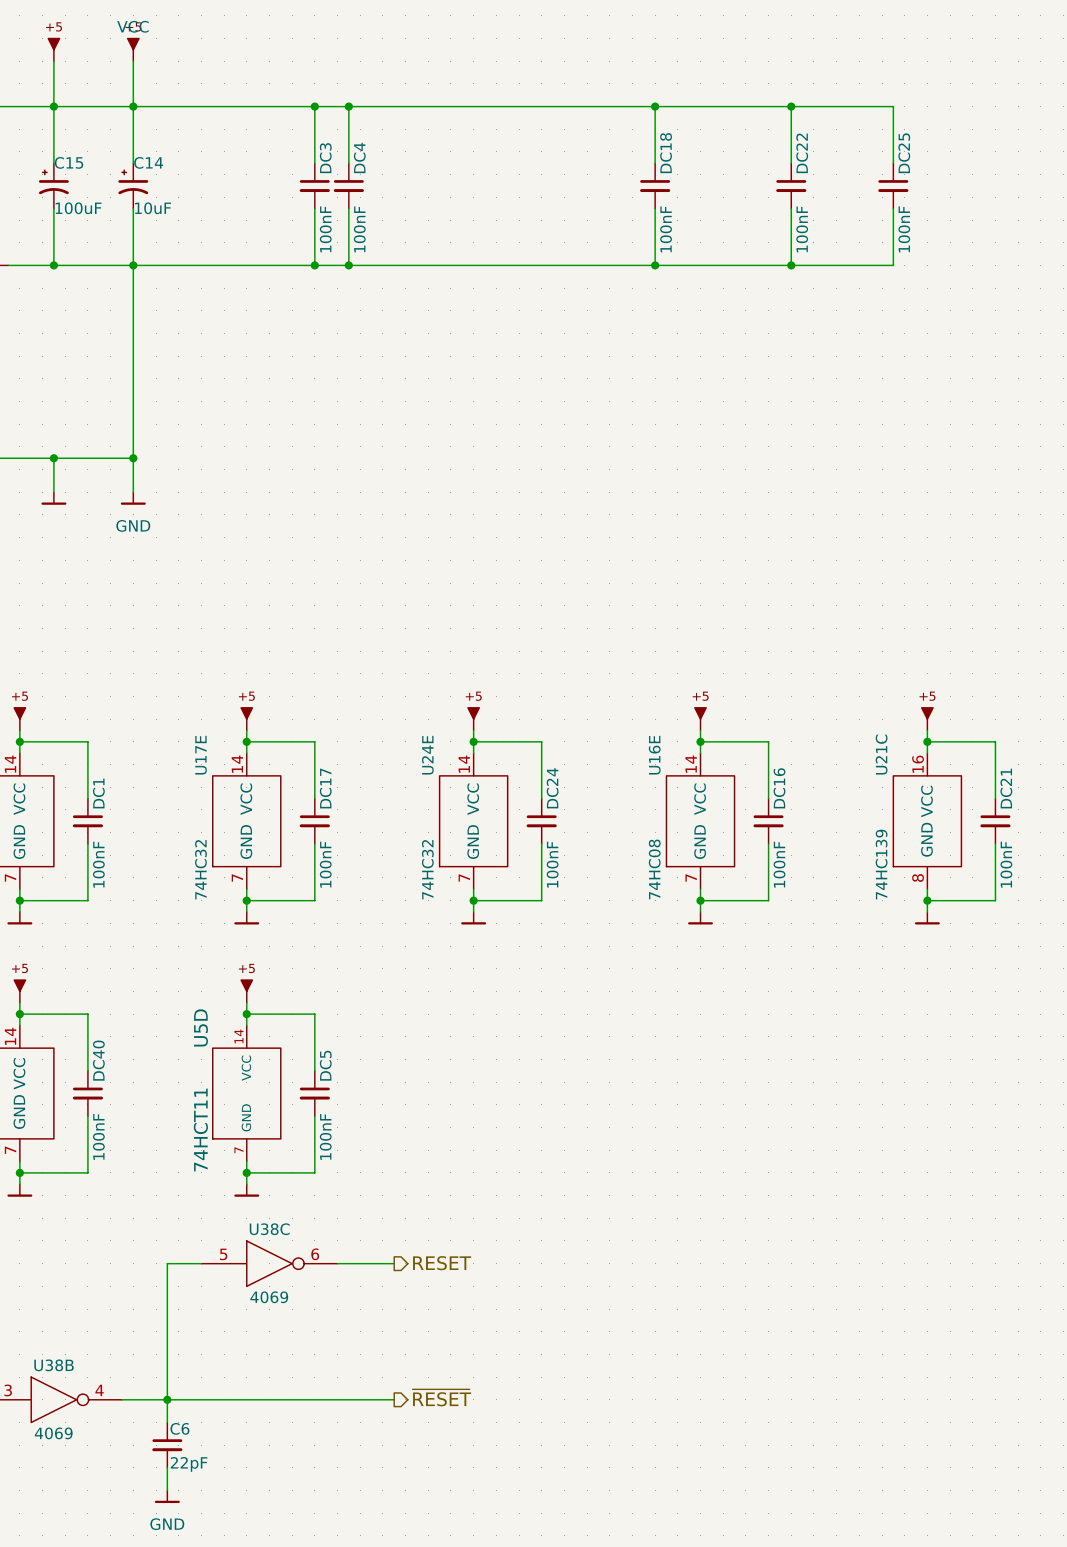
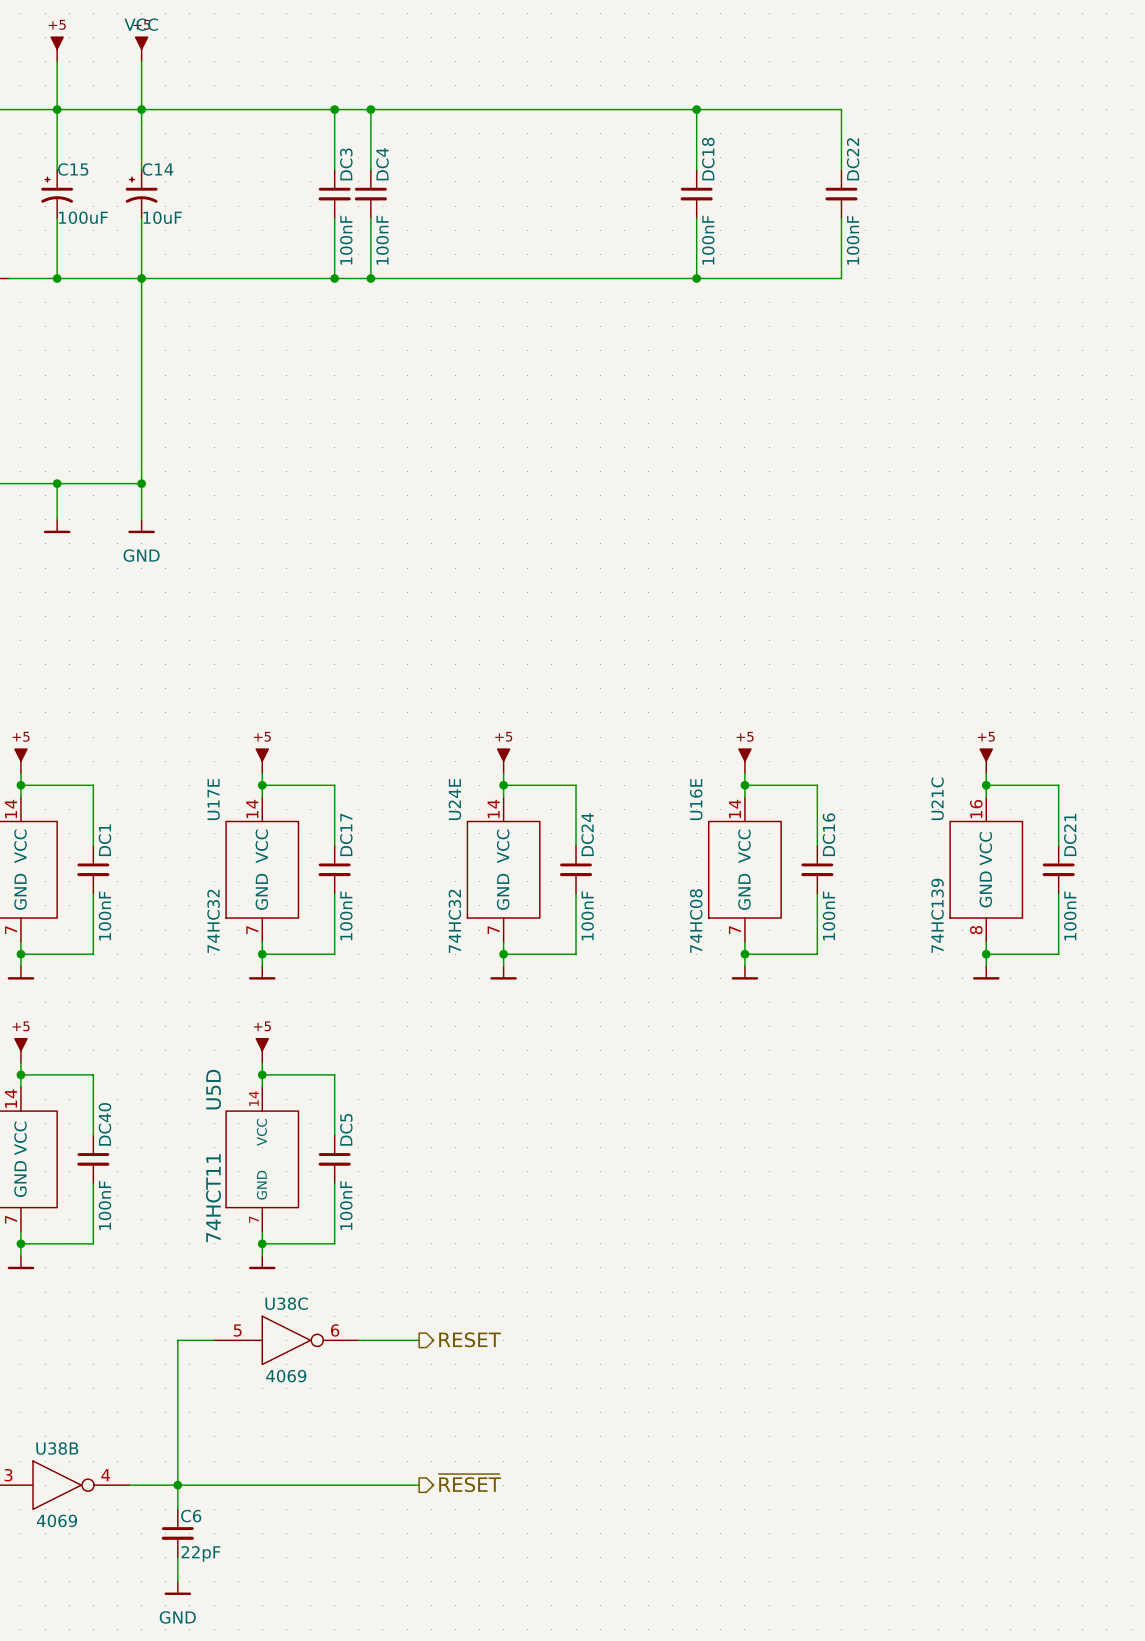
wire: (791, 106) (893, 106) (893, 163) -> none
junction: (791, 106) -> none
DC25: 100nF (893, 186) -> none
wire: (893, 208) (893, 265) (791, 265) -> none
junction: (791, 265) -> none

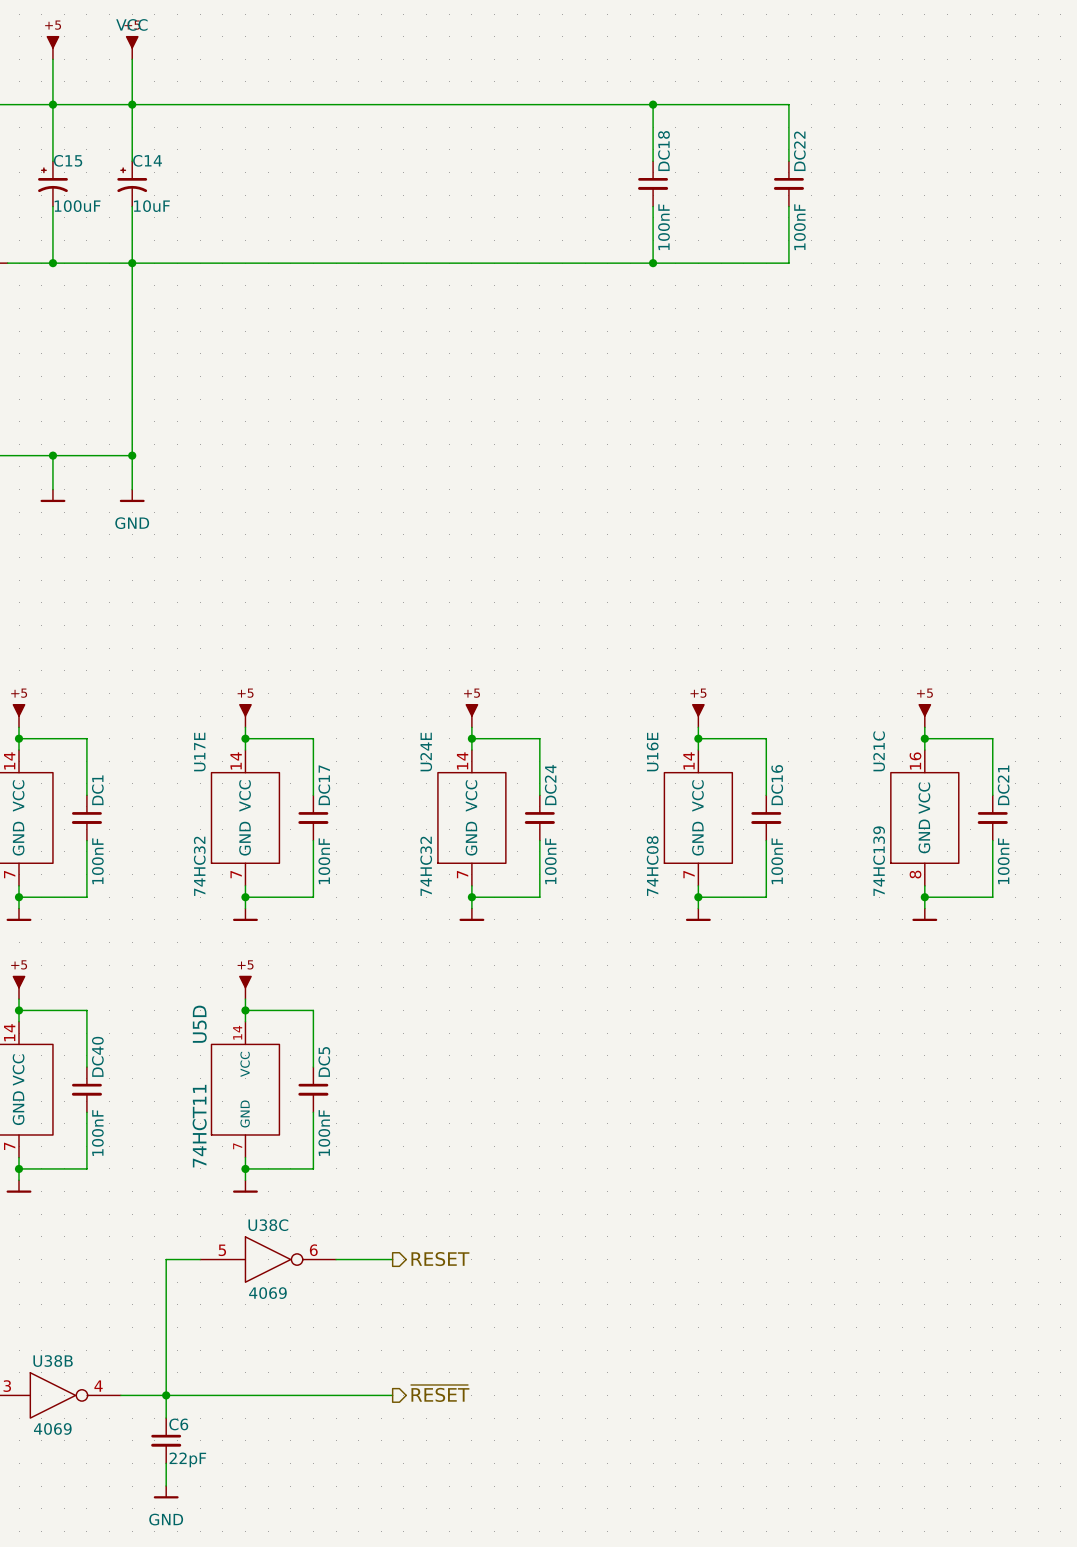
wire: (334, 109) (334, 169) -> none
junction: (334, 109) -> none
wire: (370, 109) (370, 169) -> none
junction: (370, 109) -> none
DC3: 100nF (334, 194) -> none
DC4: 100nF (370, 194) -> none
wire: (334, 218) (334, 278) -> none
wire: (370, 218) (370, 278) -> none
junction: (334, 278) -> none
junction: (370, 278) -> none

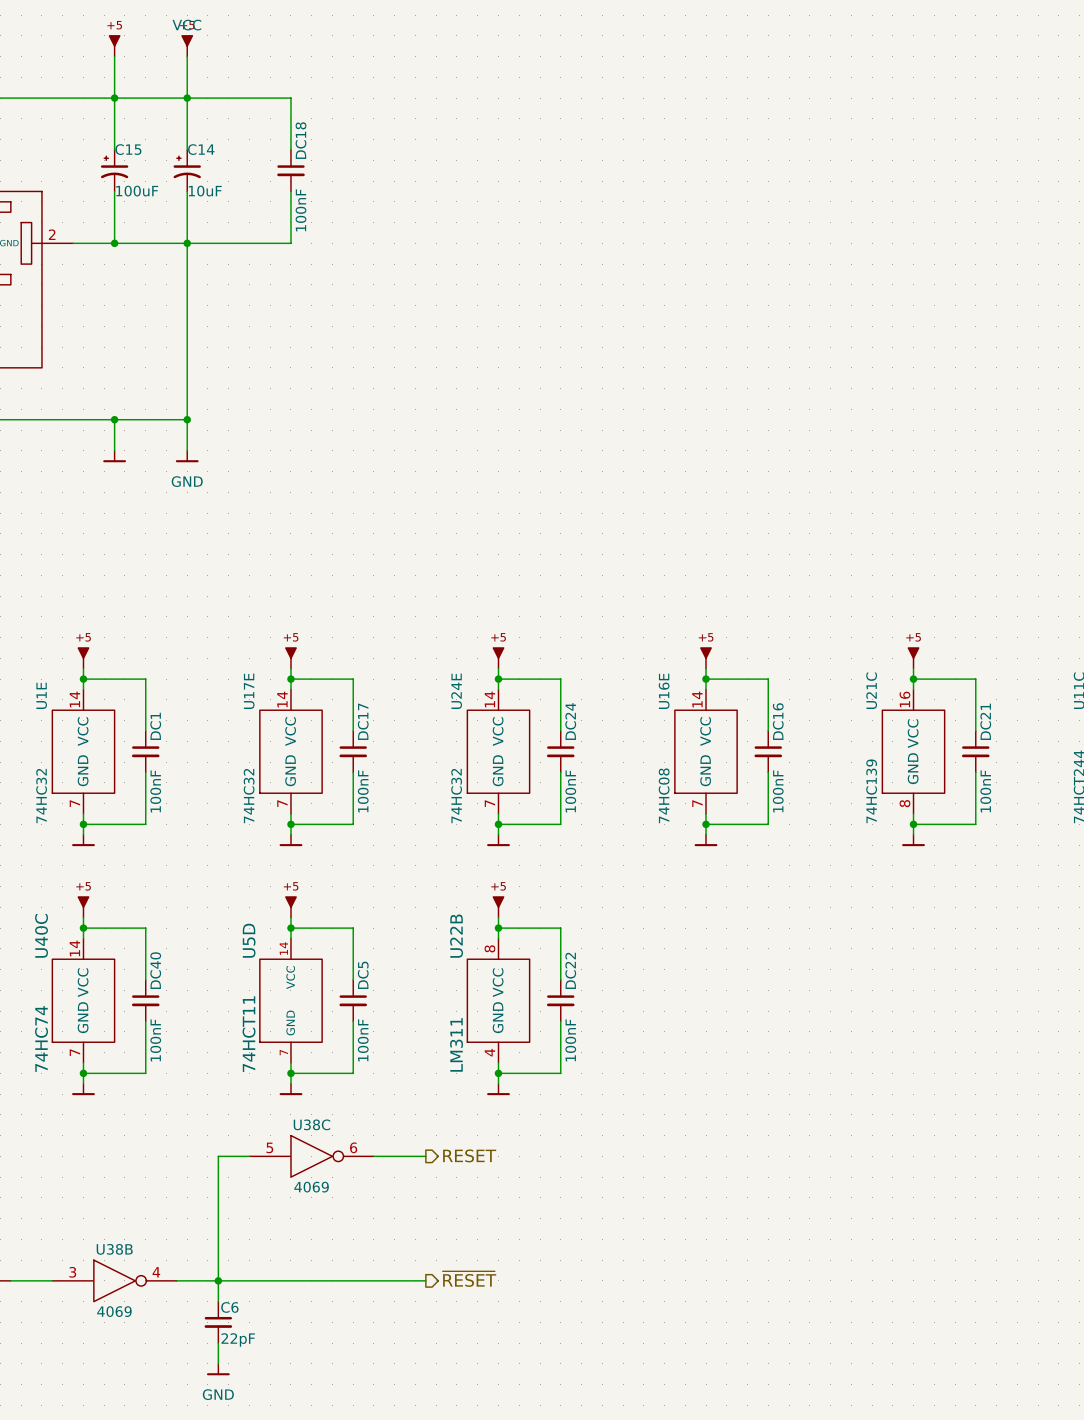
wire: (245, 104) (788, 104) (788, 161) -> (290, 98) (290, 149)
wire: (653, 104) (653, 161) -> none
junction: (653, 104) -> none
DC18 position: (653, 183) -> (290, 170)
DC22 position: (788, 183) -> (560, 1000)
wire: (653, 206) (653, 263) -> none
wire: (788, 206) (788, 263) (245, 263) -> (290, 191) (290, 243)
junction: (653, 263) -> none
power symbol: none -> (498, 907)
wire: none -> (498, 917) (498, 938)
wire: none -> (498, 928) (560, 928) (560, 979)
junction: none -> (498, 928)
U22B: none -> LM311 (498, 1000)
wire: none -> (560, 1021) (560, 1073) (498, 1073)
wire: none -> (498, 1062) (498, 1083)
junction: none -> (498, 1073)
power symbol: none -> (498, 1089)

